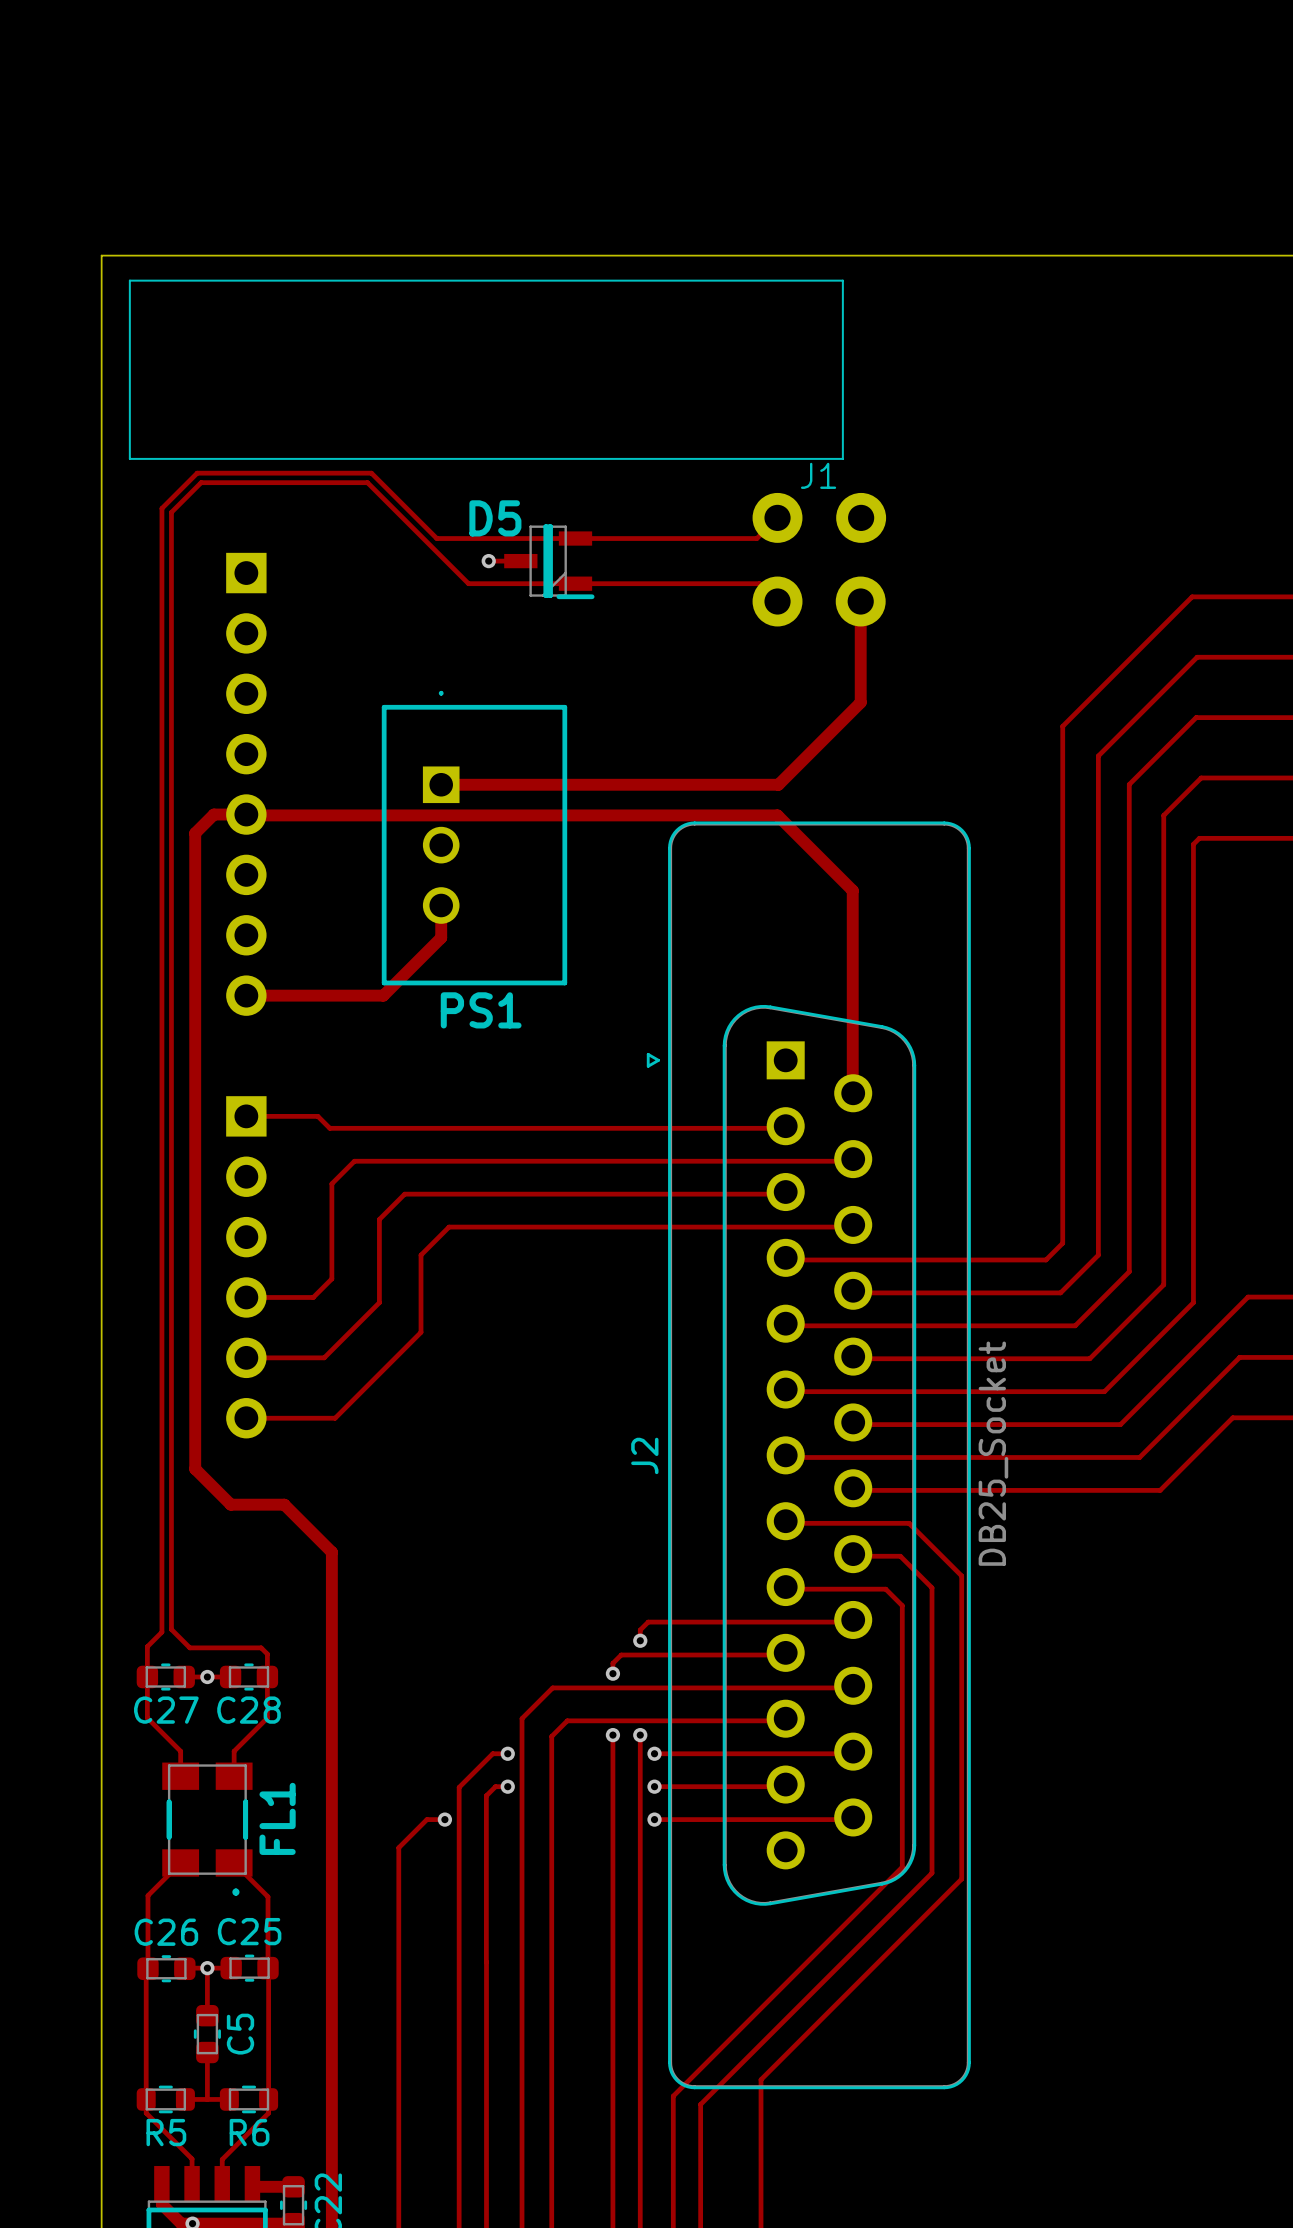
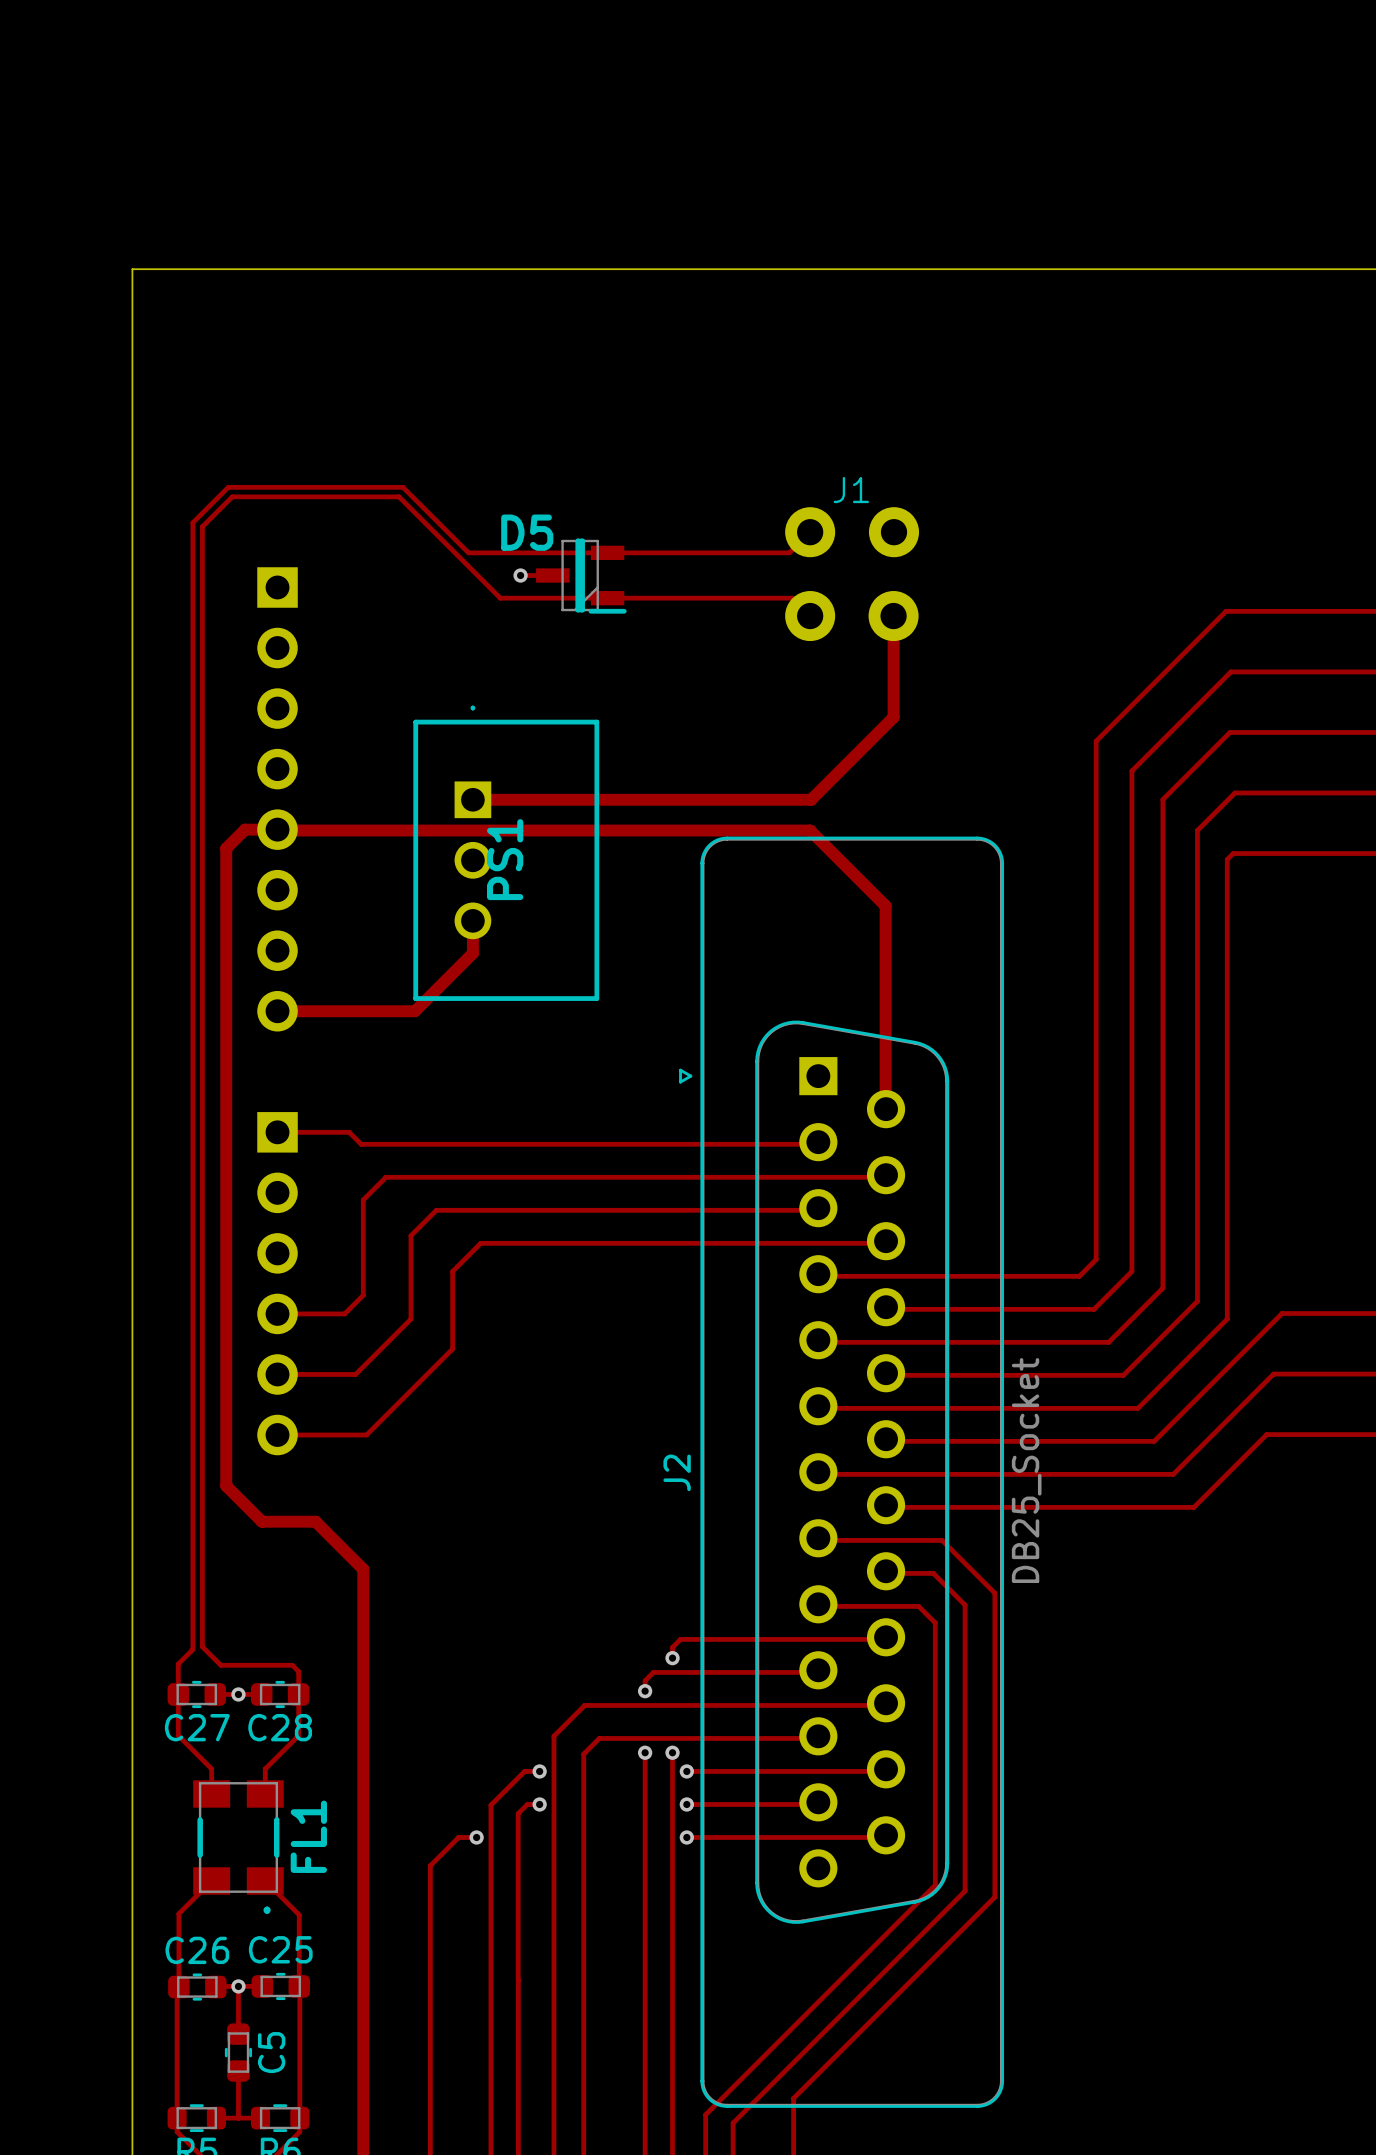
line: (129, 280) (129, 458) (842, 458) (842, 280) (129, 280) -> none
PS1 name rotation: 0° (481, 1010) -> 90° counterclockwise (505, 859)
PS1 name position: PS1 (481, 1010) -> PS1 (505, 859)

